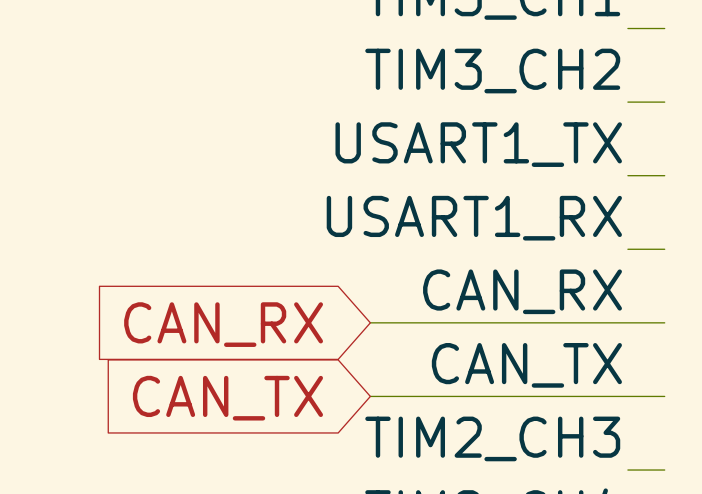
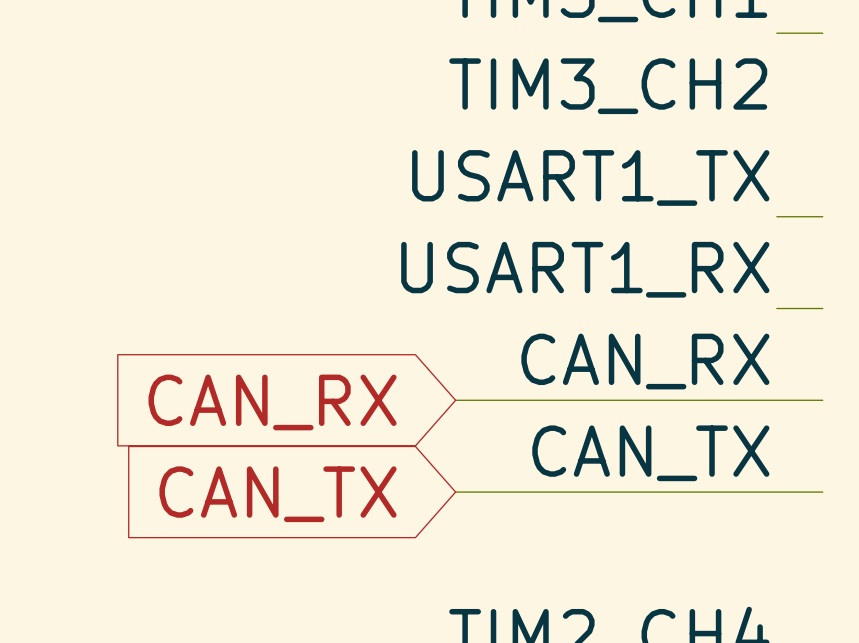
wire: (627, 102) (664, 102) -> none
label: TIM2_CH3 (492, 438) -> none
wire: (627, 470) (664, 470) -> none

